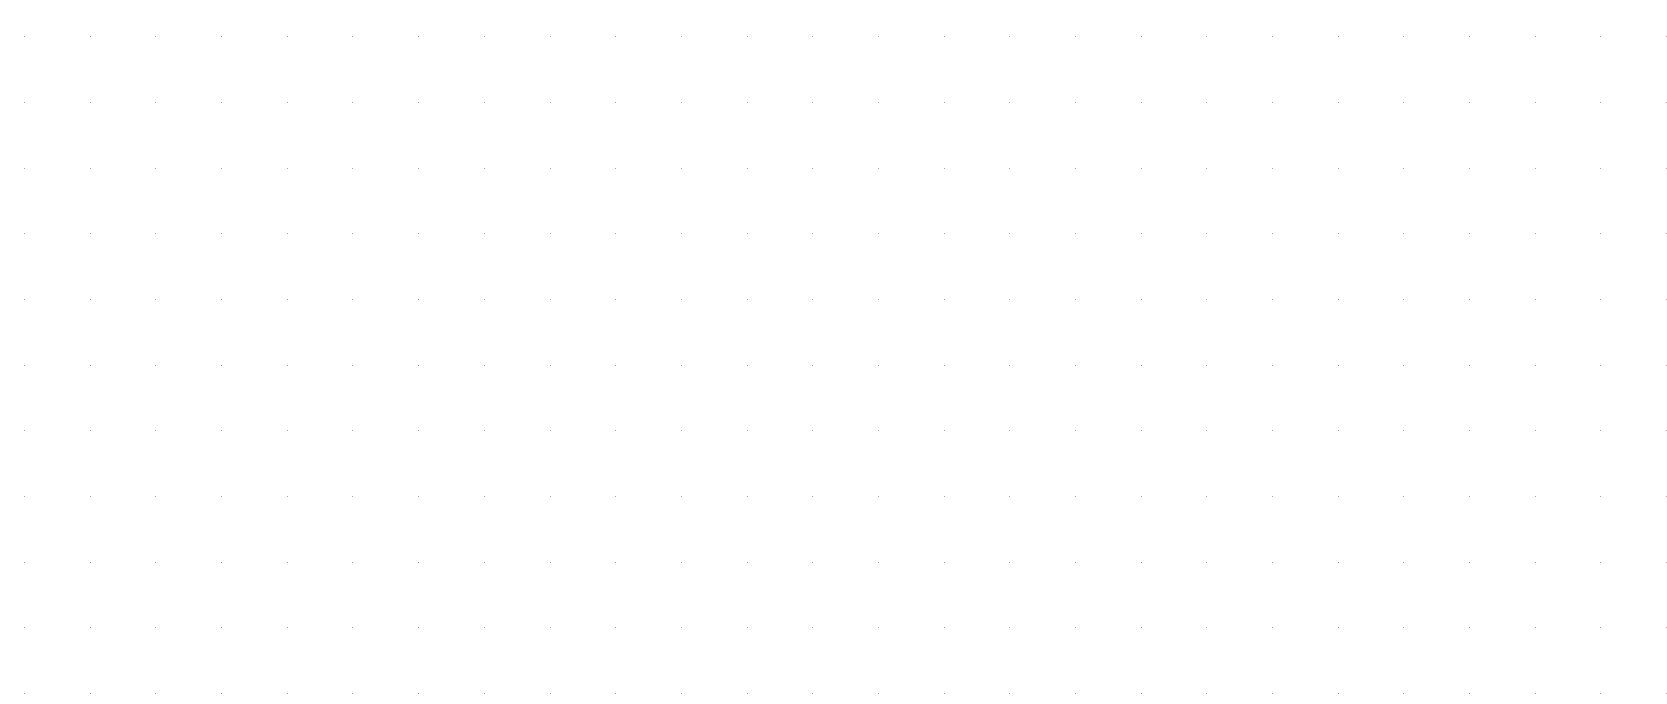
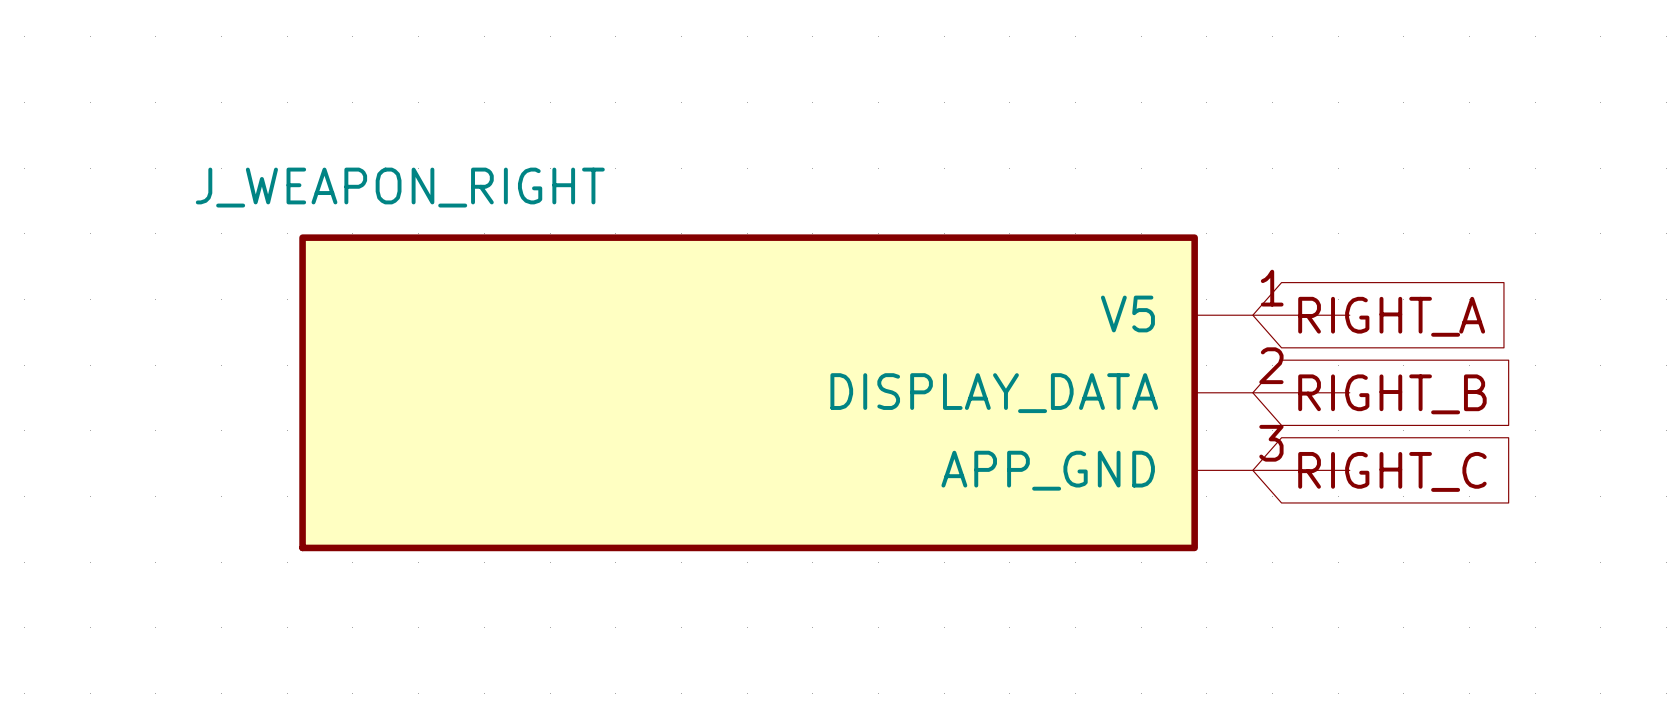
global label: none -> RIGHT_A (1391, 316)
J_WEAPON_RIGHT: none -> (824, 392)
global label: none -> RIGHT_B (1392, 394)
global label: none -> RIGHT_C (1392, 471)

